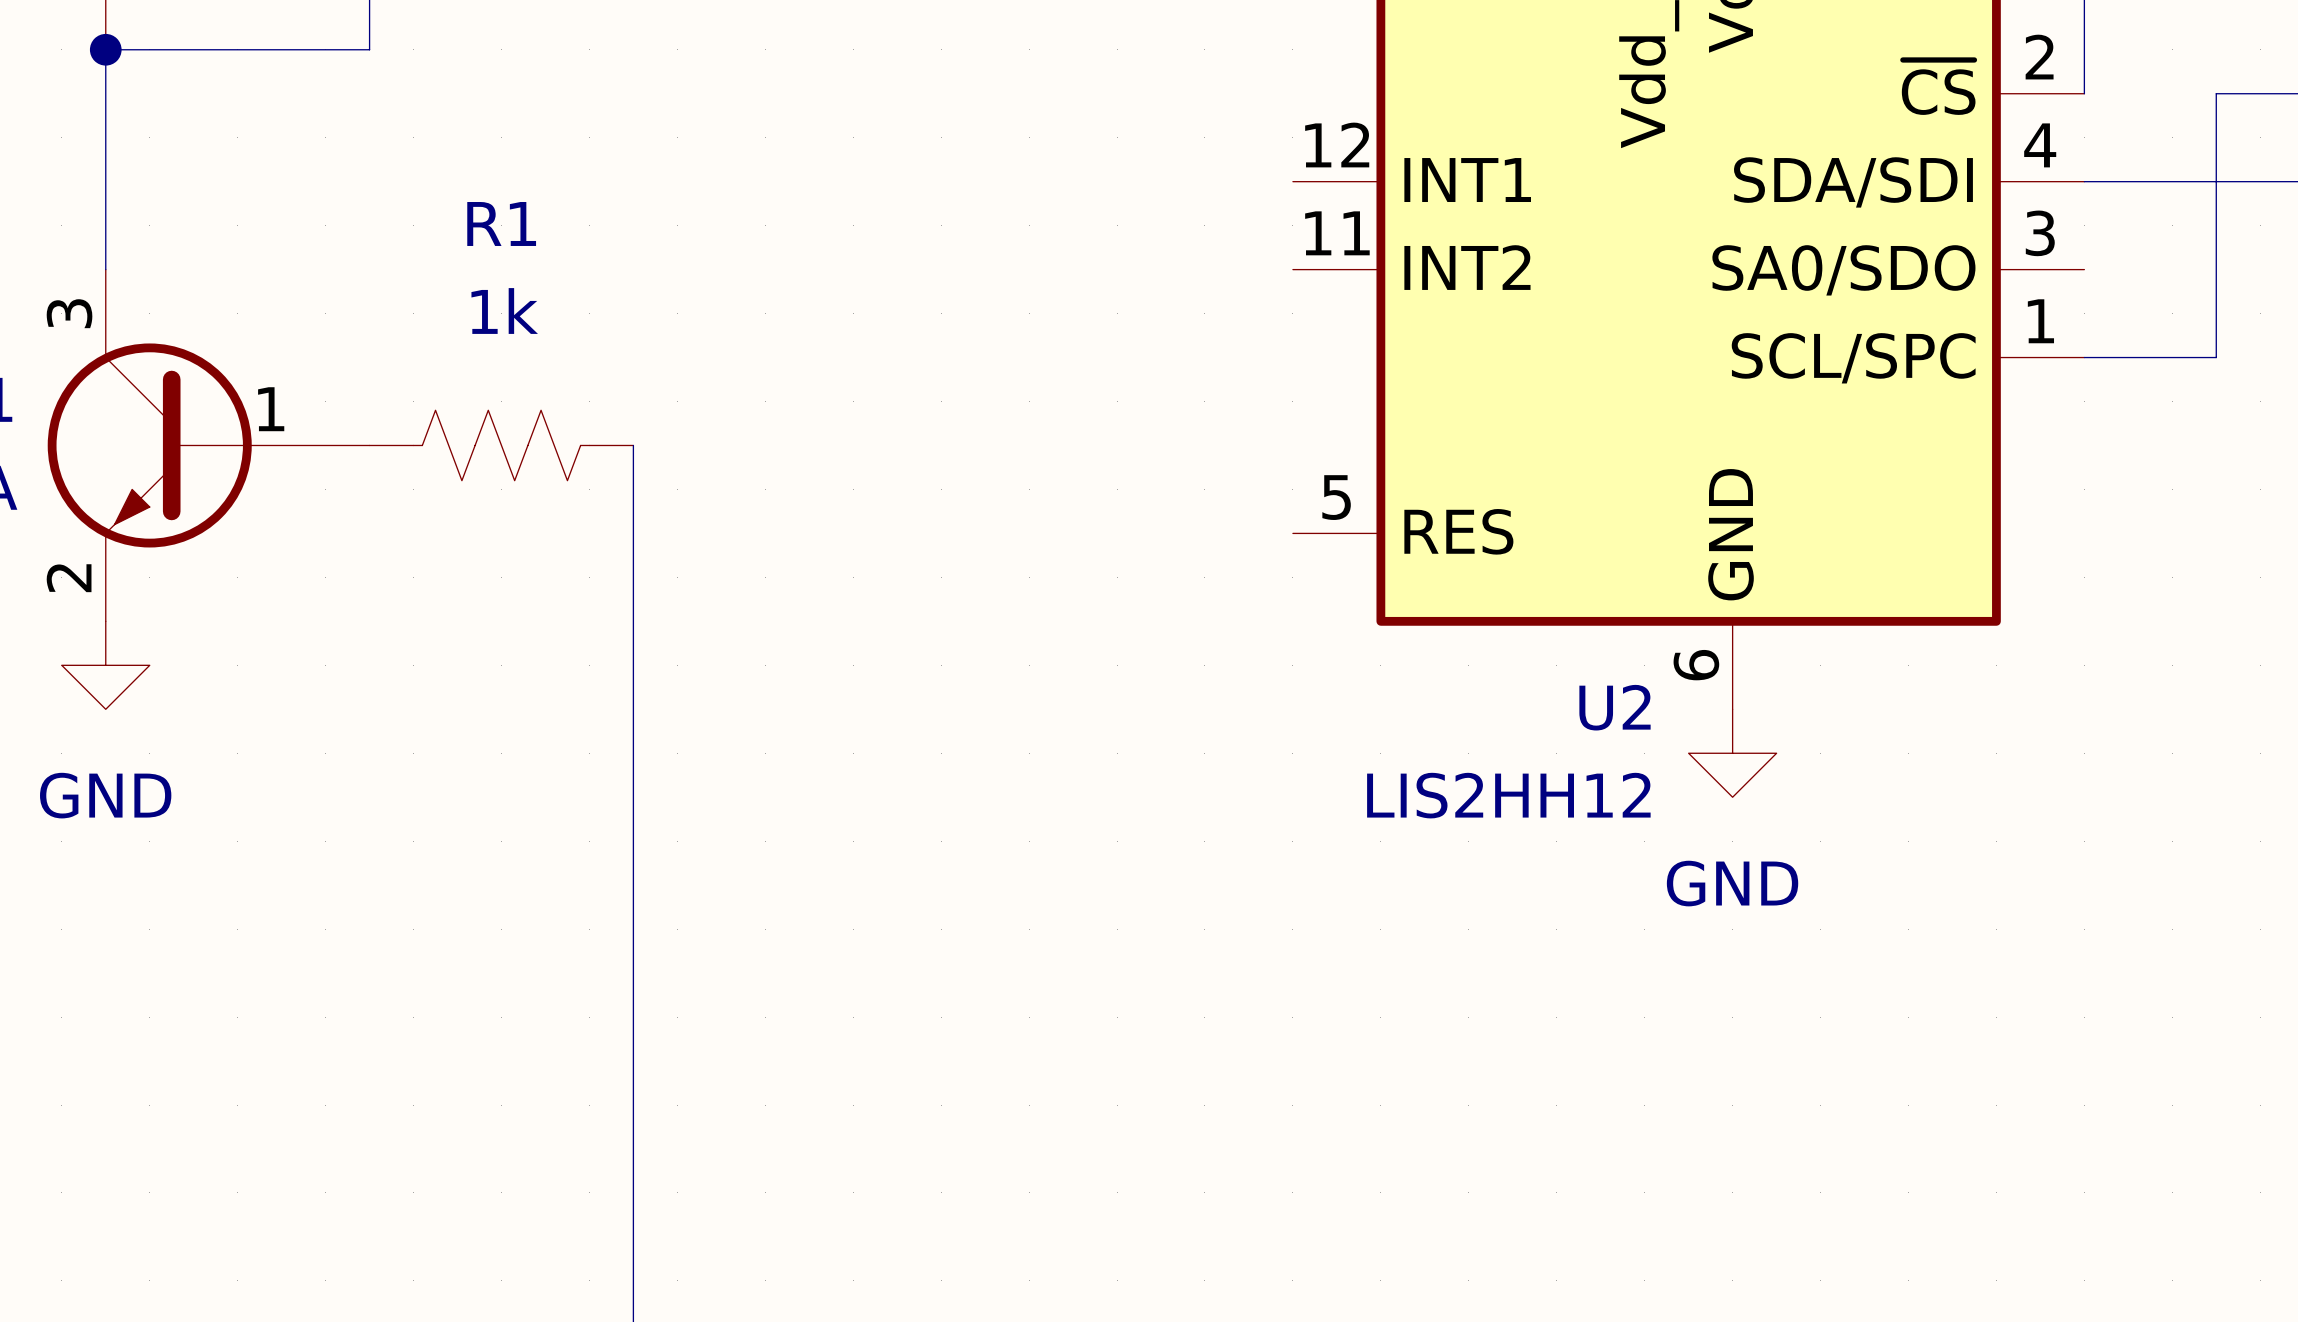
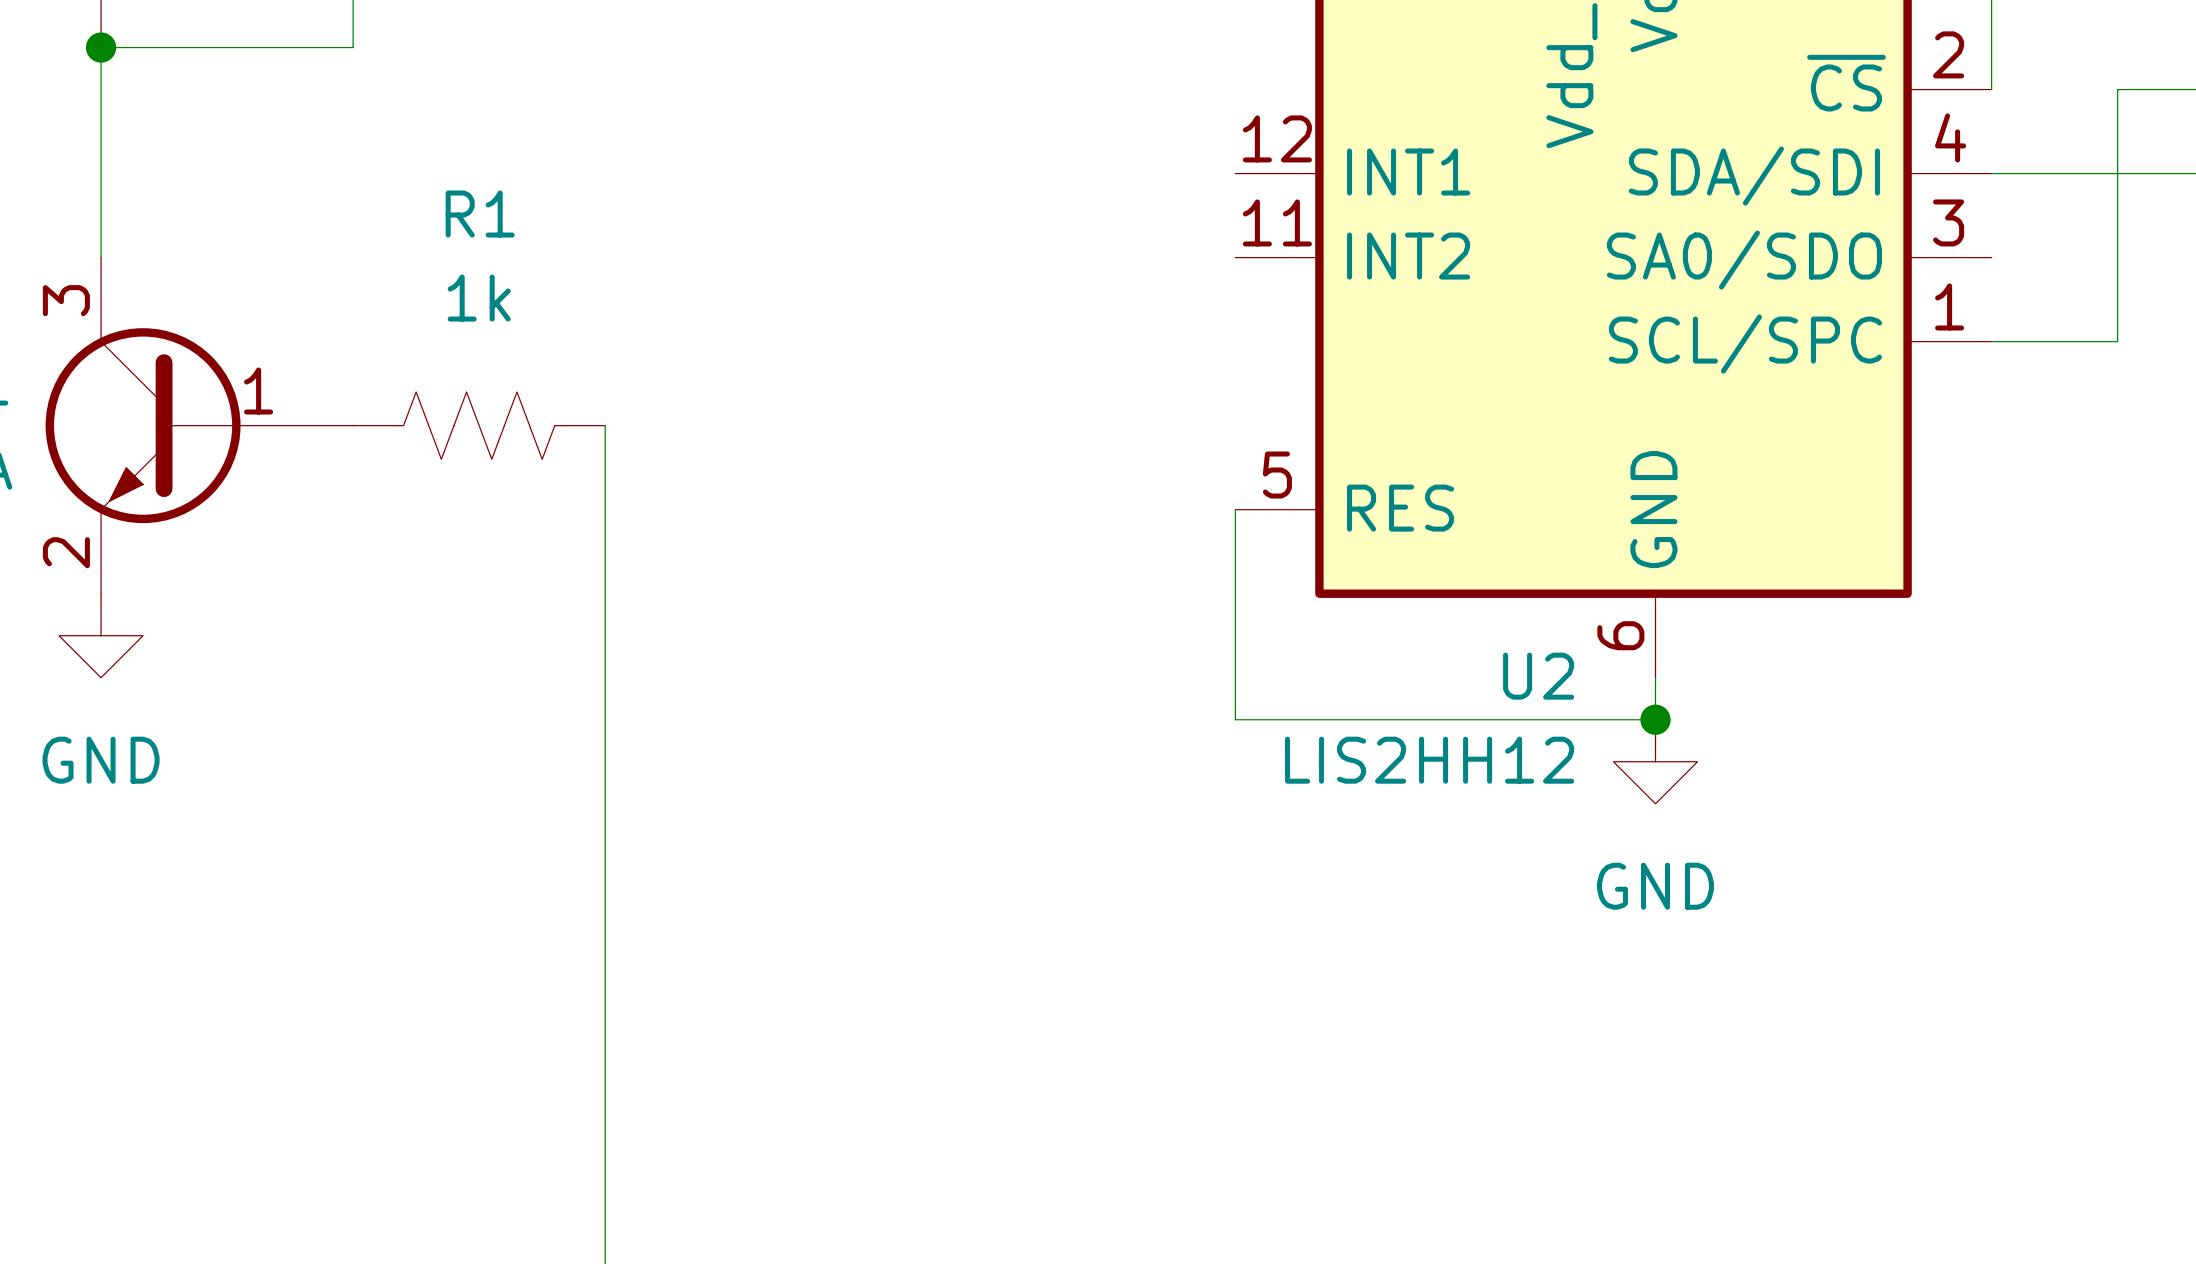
wire: none -> (1235, 509) (1235, 719) (1655, 719) (1655, 677)
power symbol position: GND (1732, 753) -> GND (1655, 761)
junction: none -> (1655, 719)

